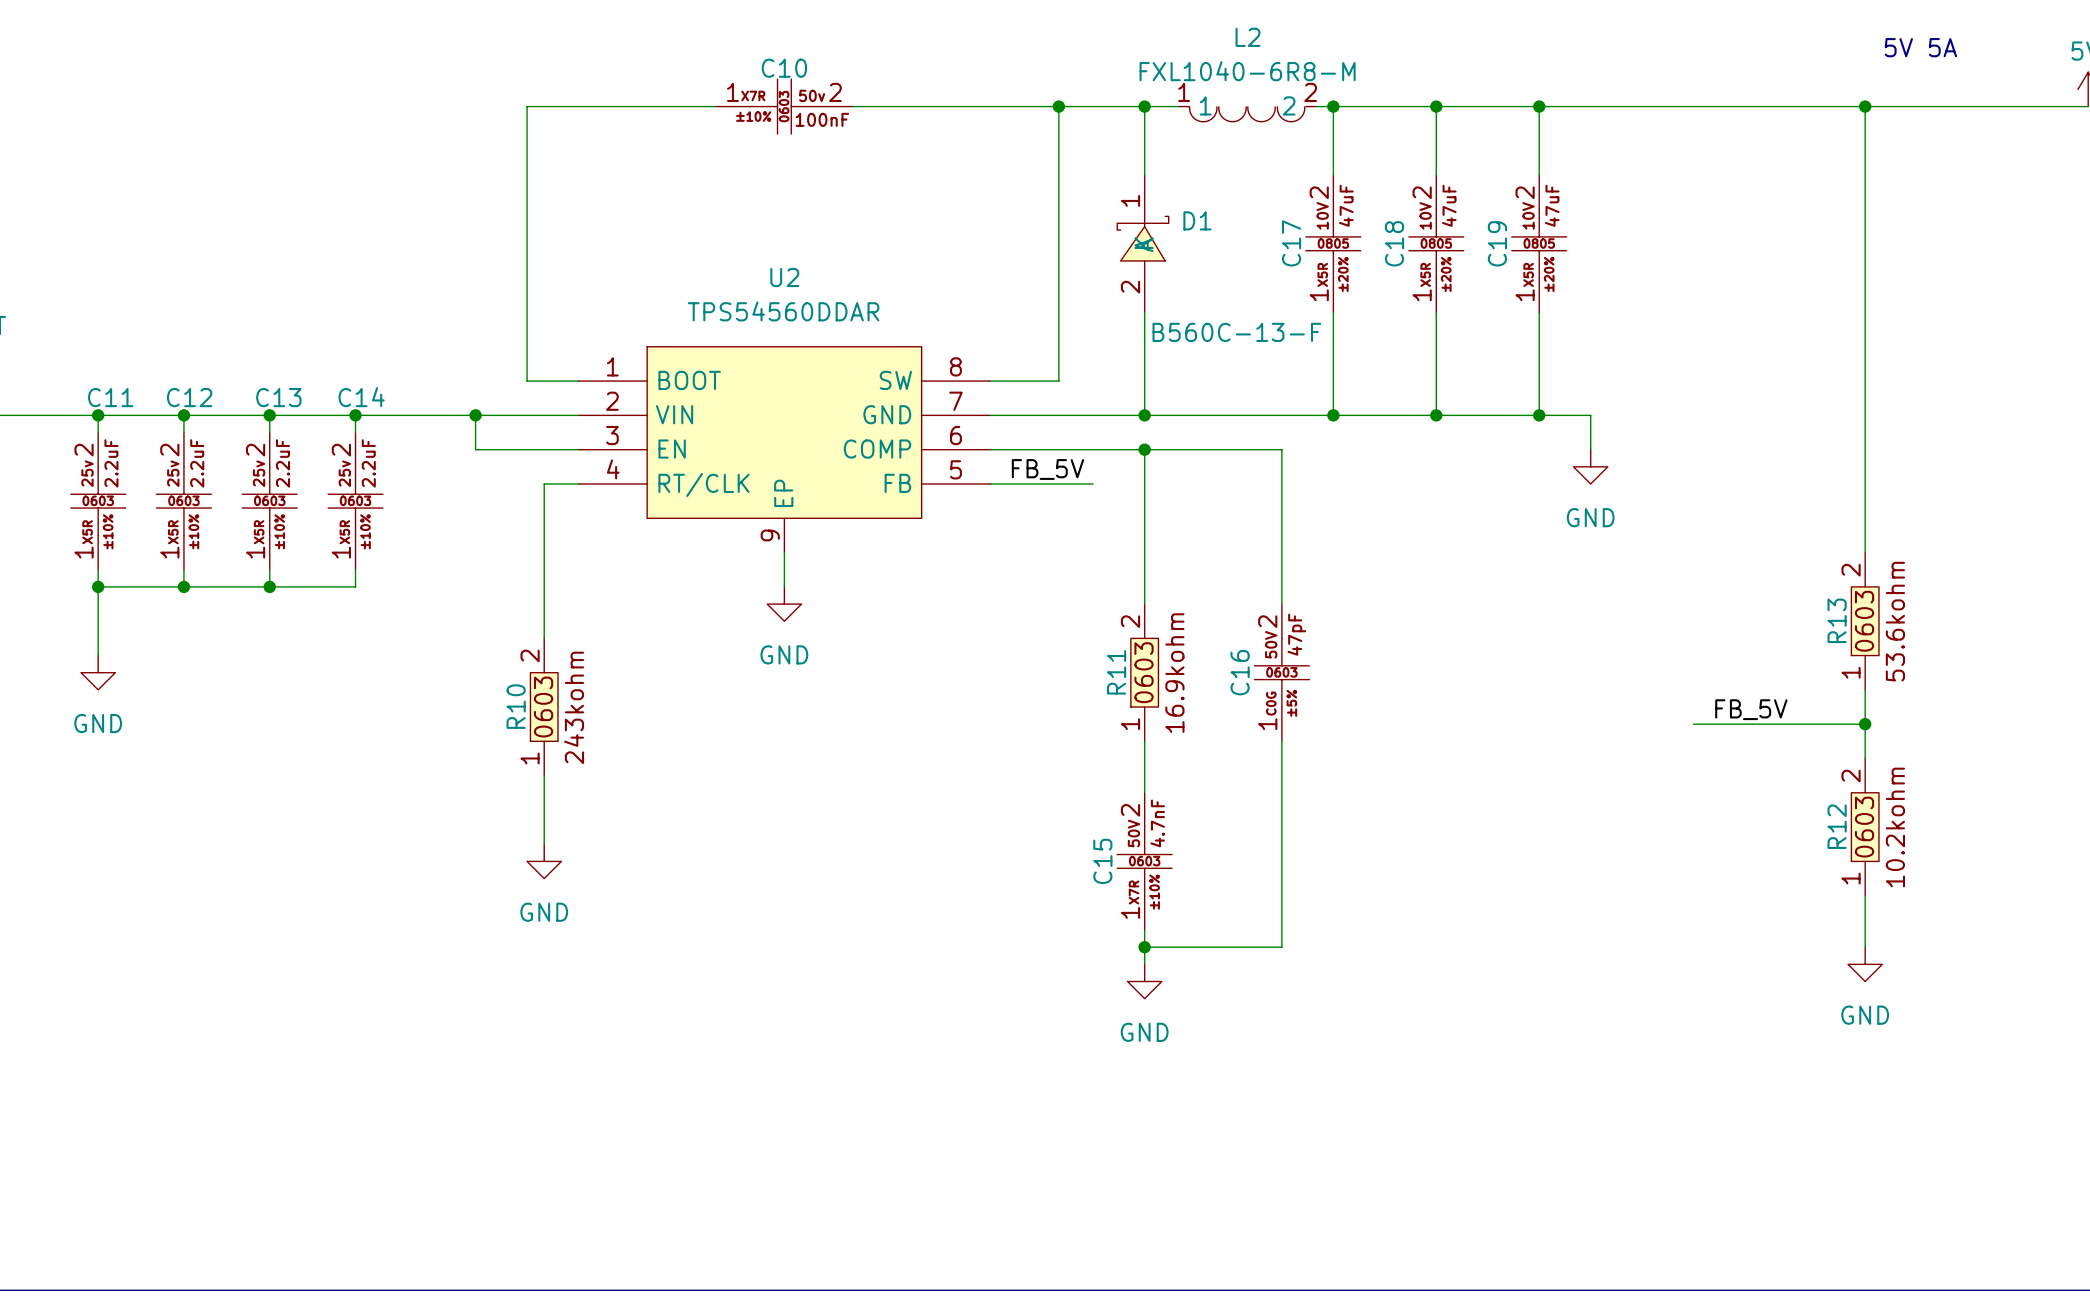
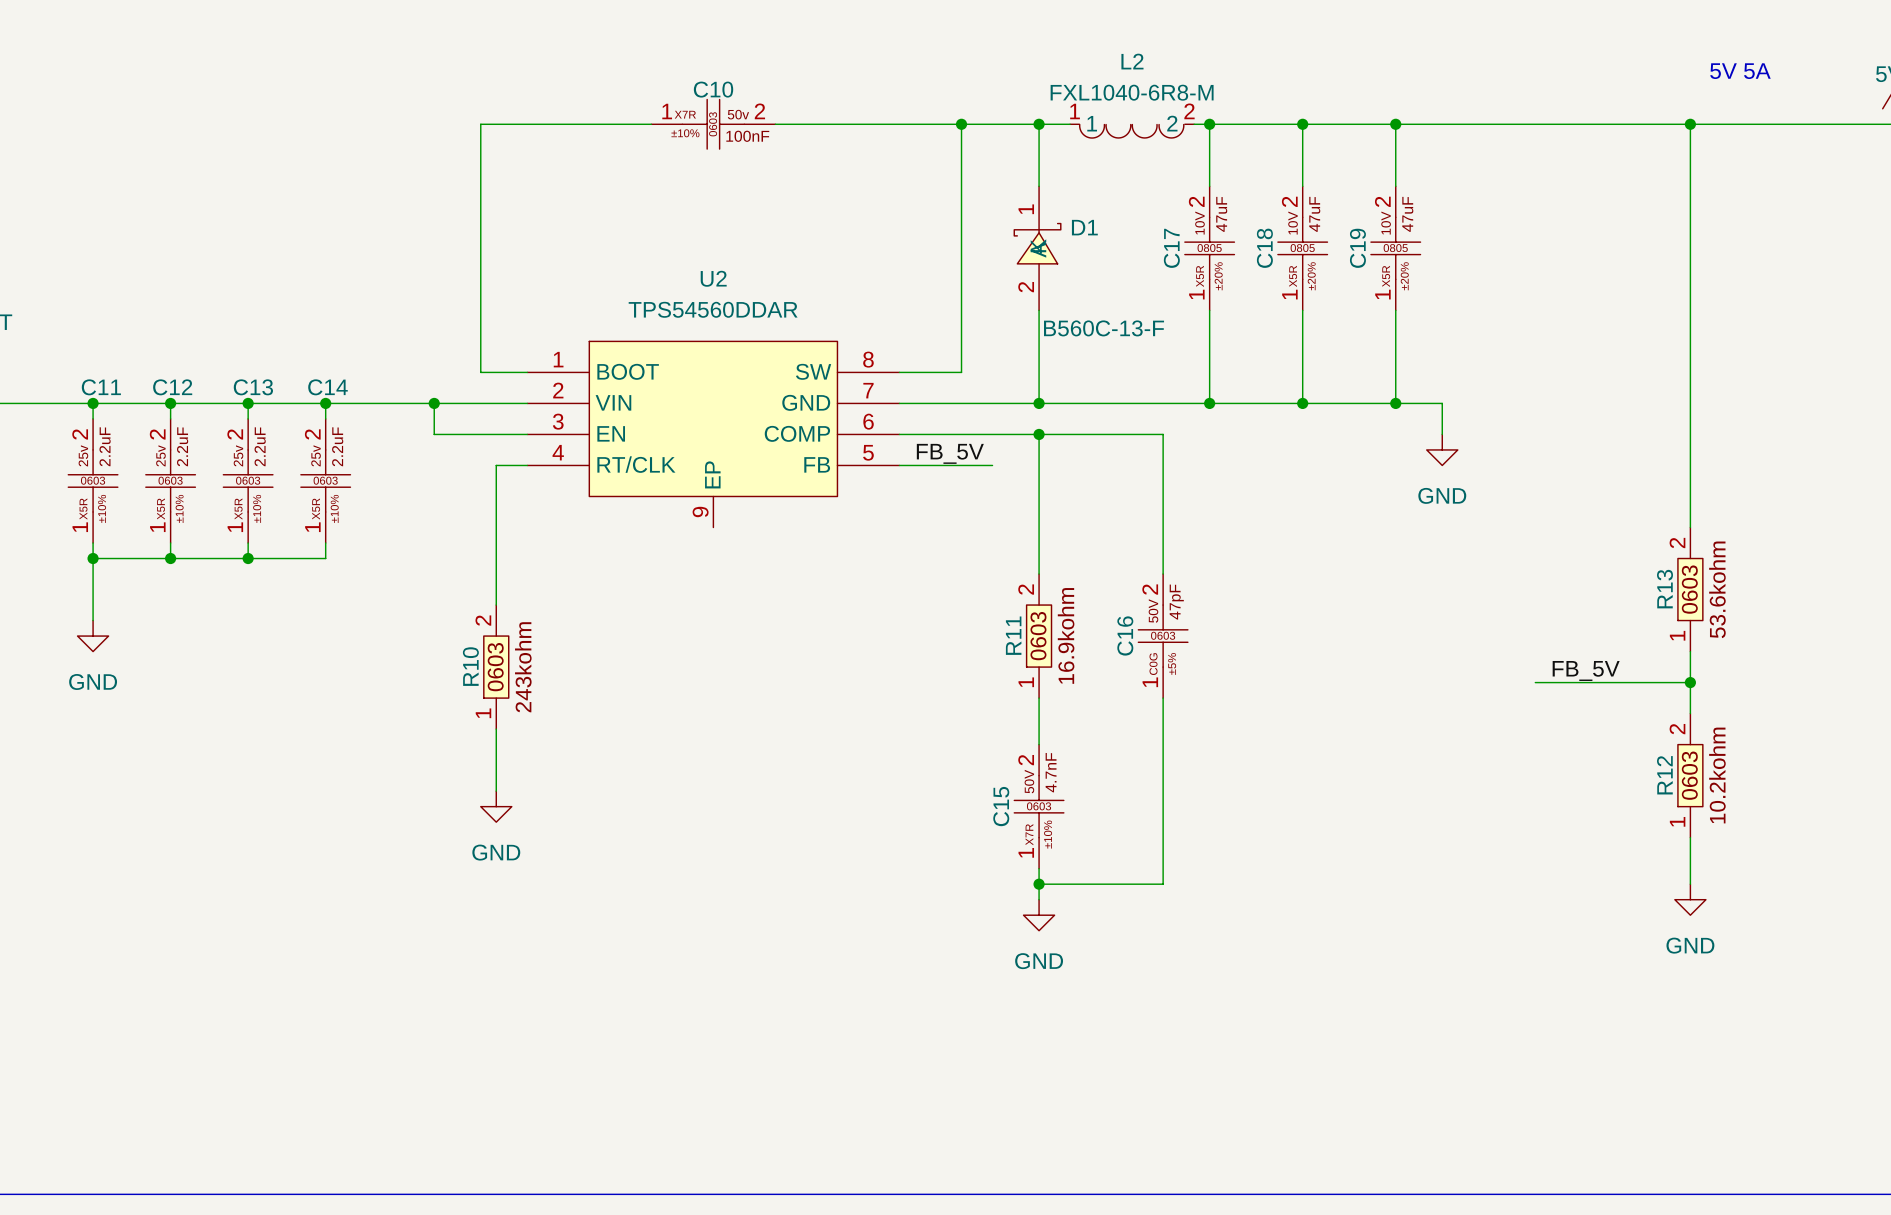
wire: (784, 552) (784, 586) -> none
power symbol: GND (784, 604) -> none

